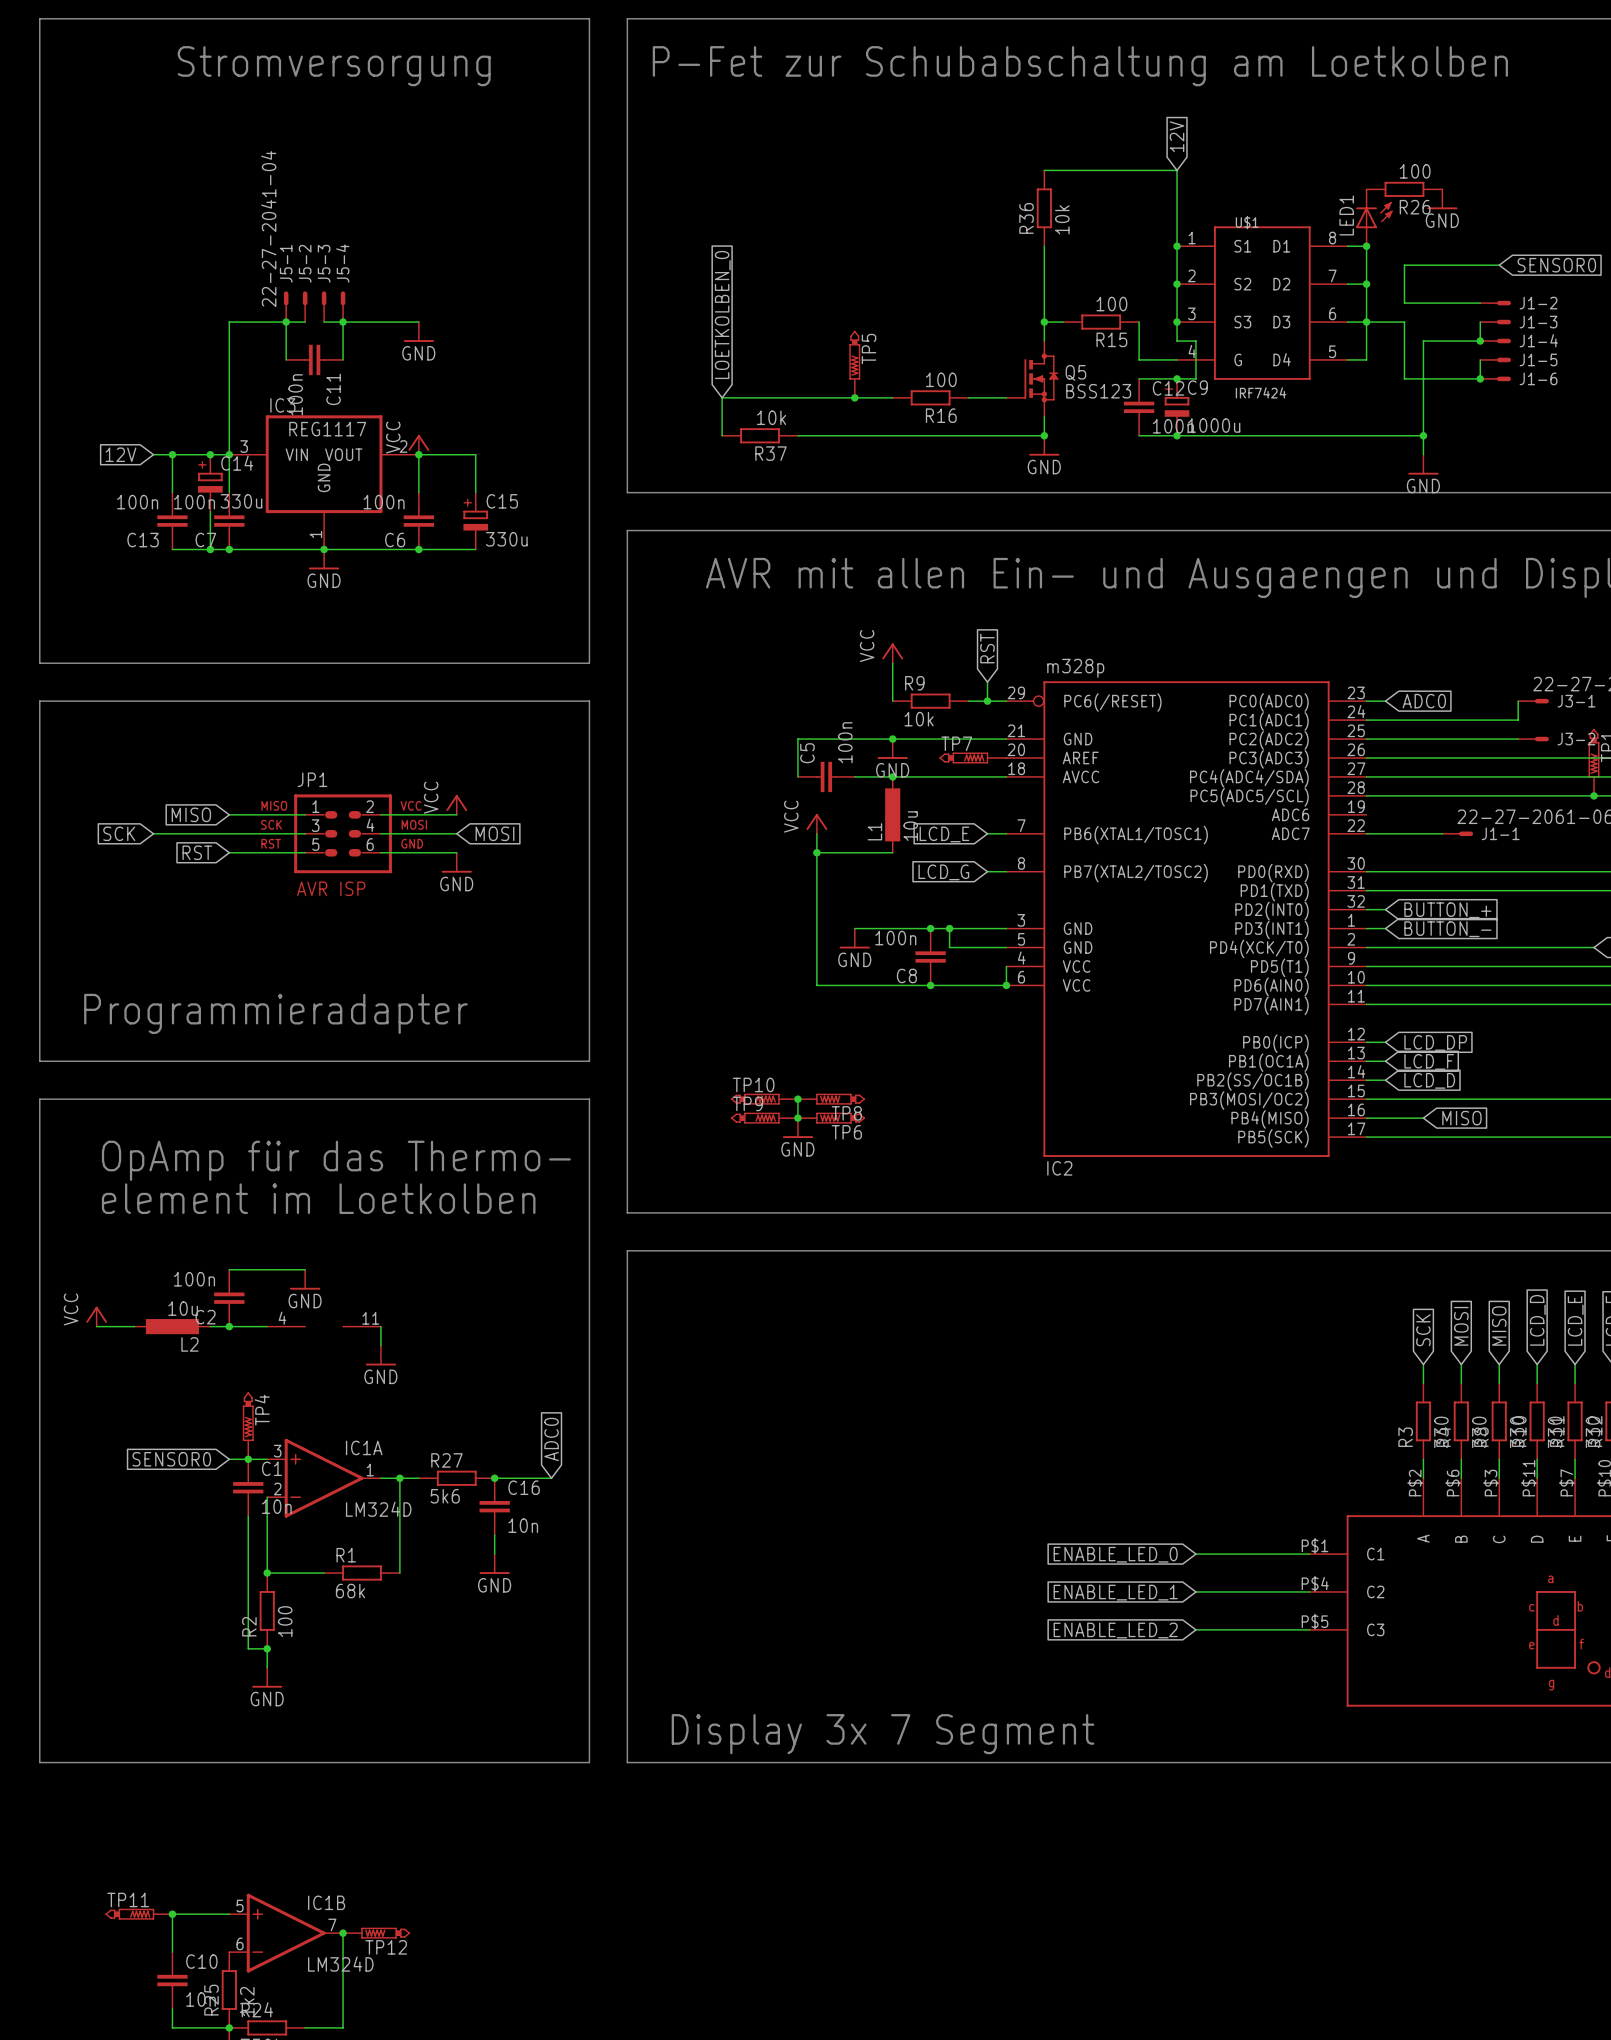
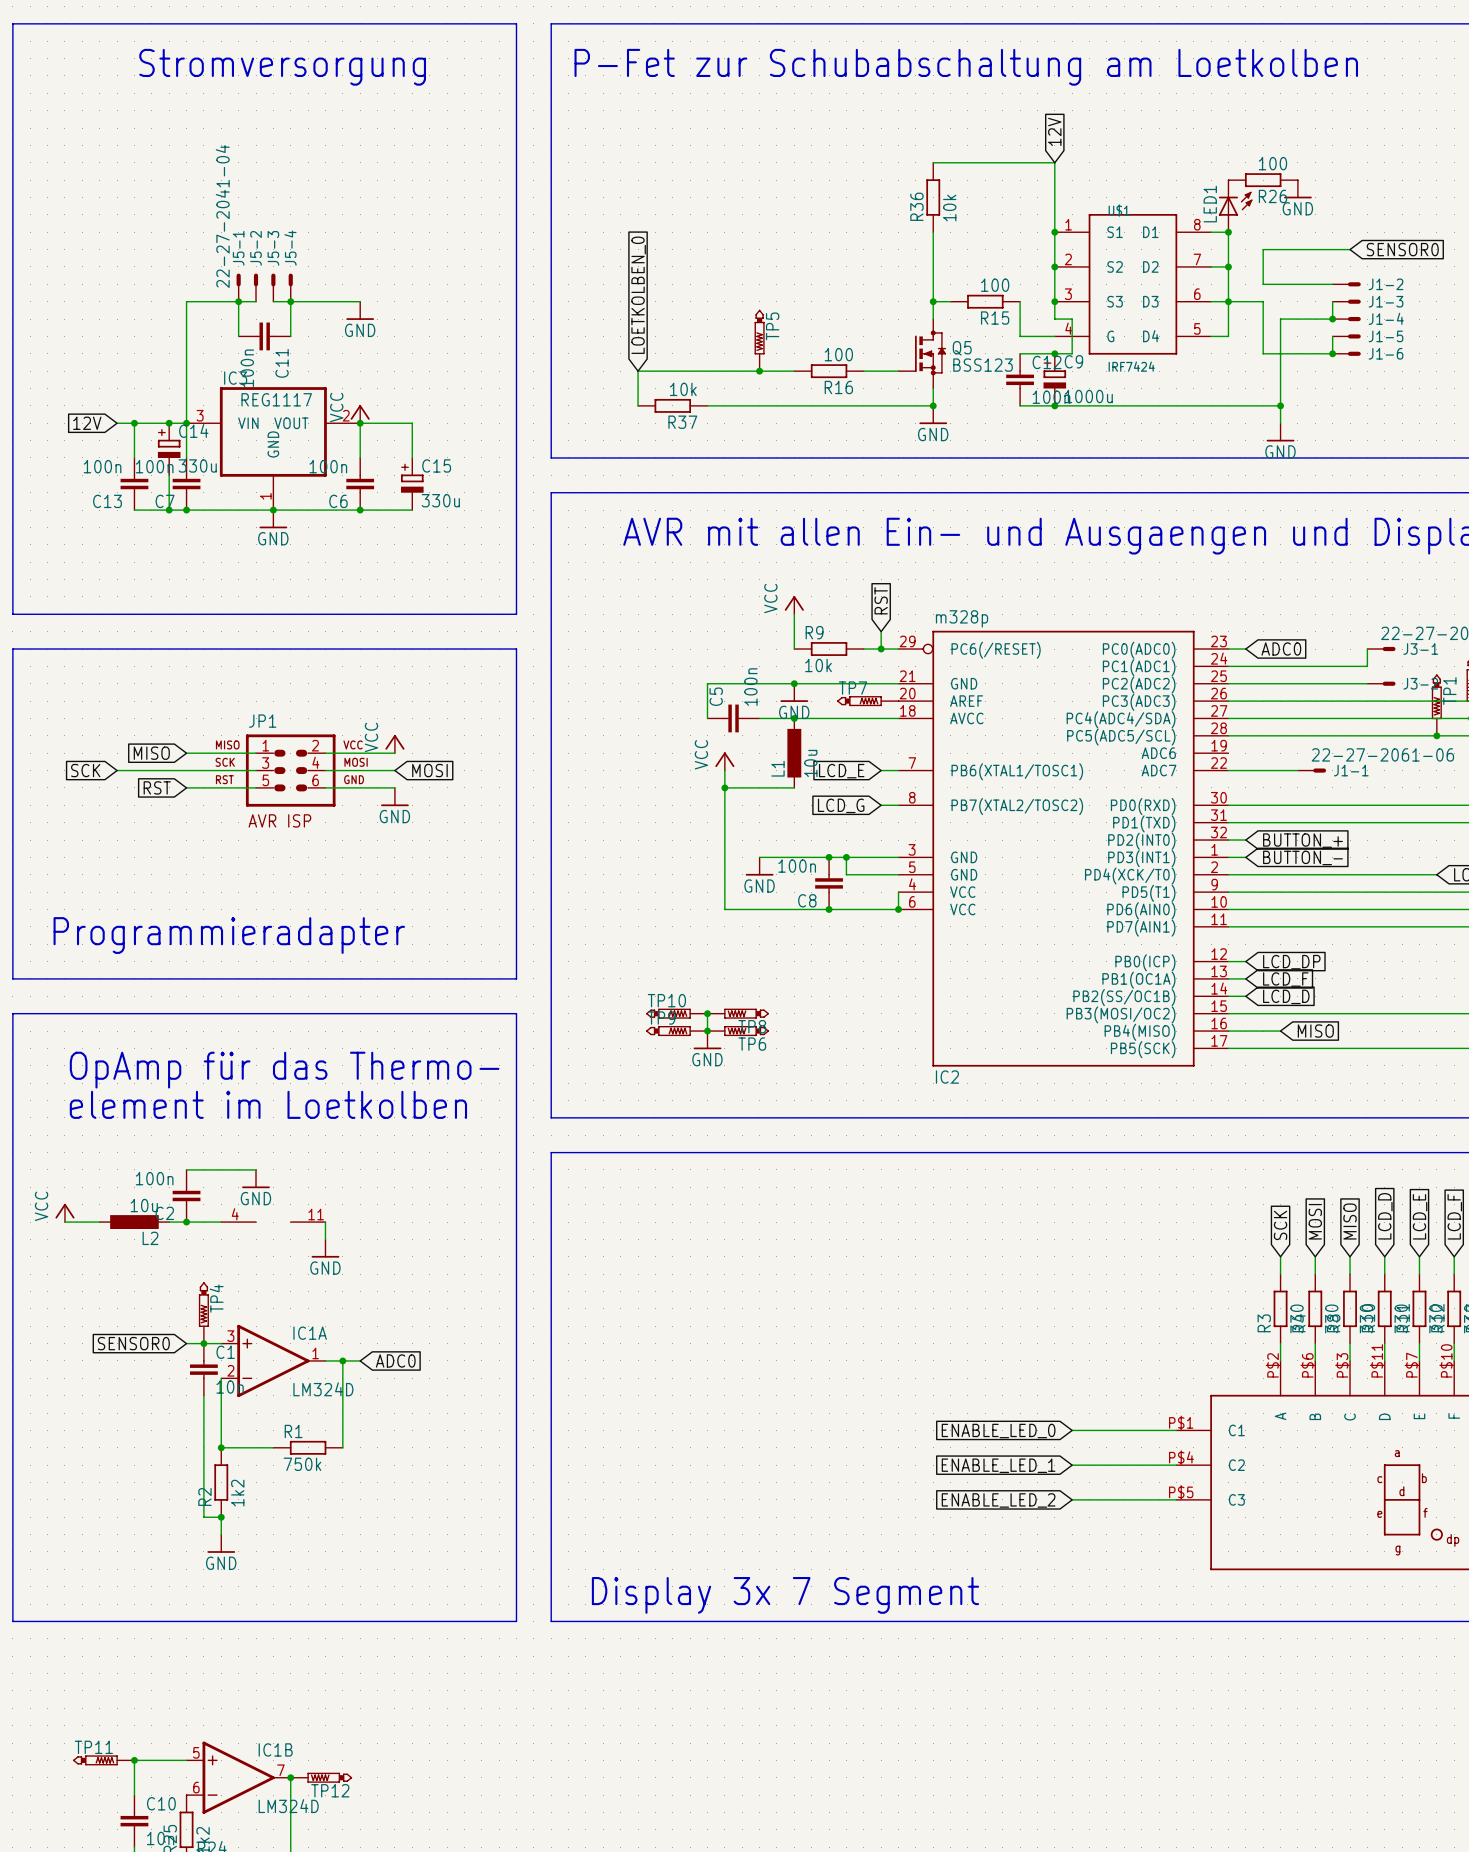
global label rotation: 0° (551, 1439) -> 90° clockwise (395, 1360)
global label position: ADC0 (551, 1439) -> ADC0 (395, 1360)
R27: 5k6 (456, 1478) -> none
wire: (494, 1478) (551, 1478) -> none
junction: (494, 1478) -> none
C16: 10n (494, 1506) -> none
wire: (494, 1535) (494, 1554) -> none
power symbol: GND (494, 1564) -> none
R1 value: 68k (350, 1591) -> 750k (302, 1464)
R2 value: 100 (285, 1621) -> 1k2 (237, 1493)

